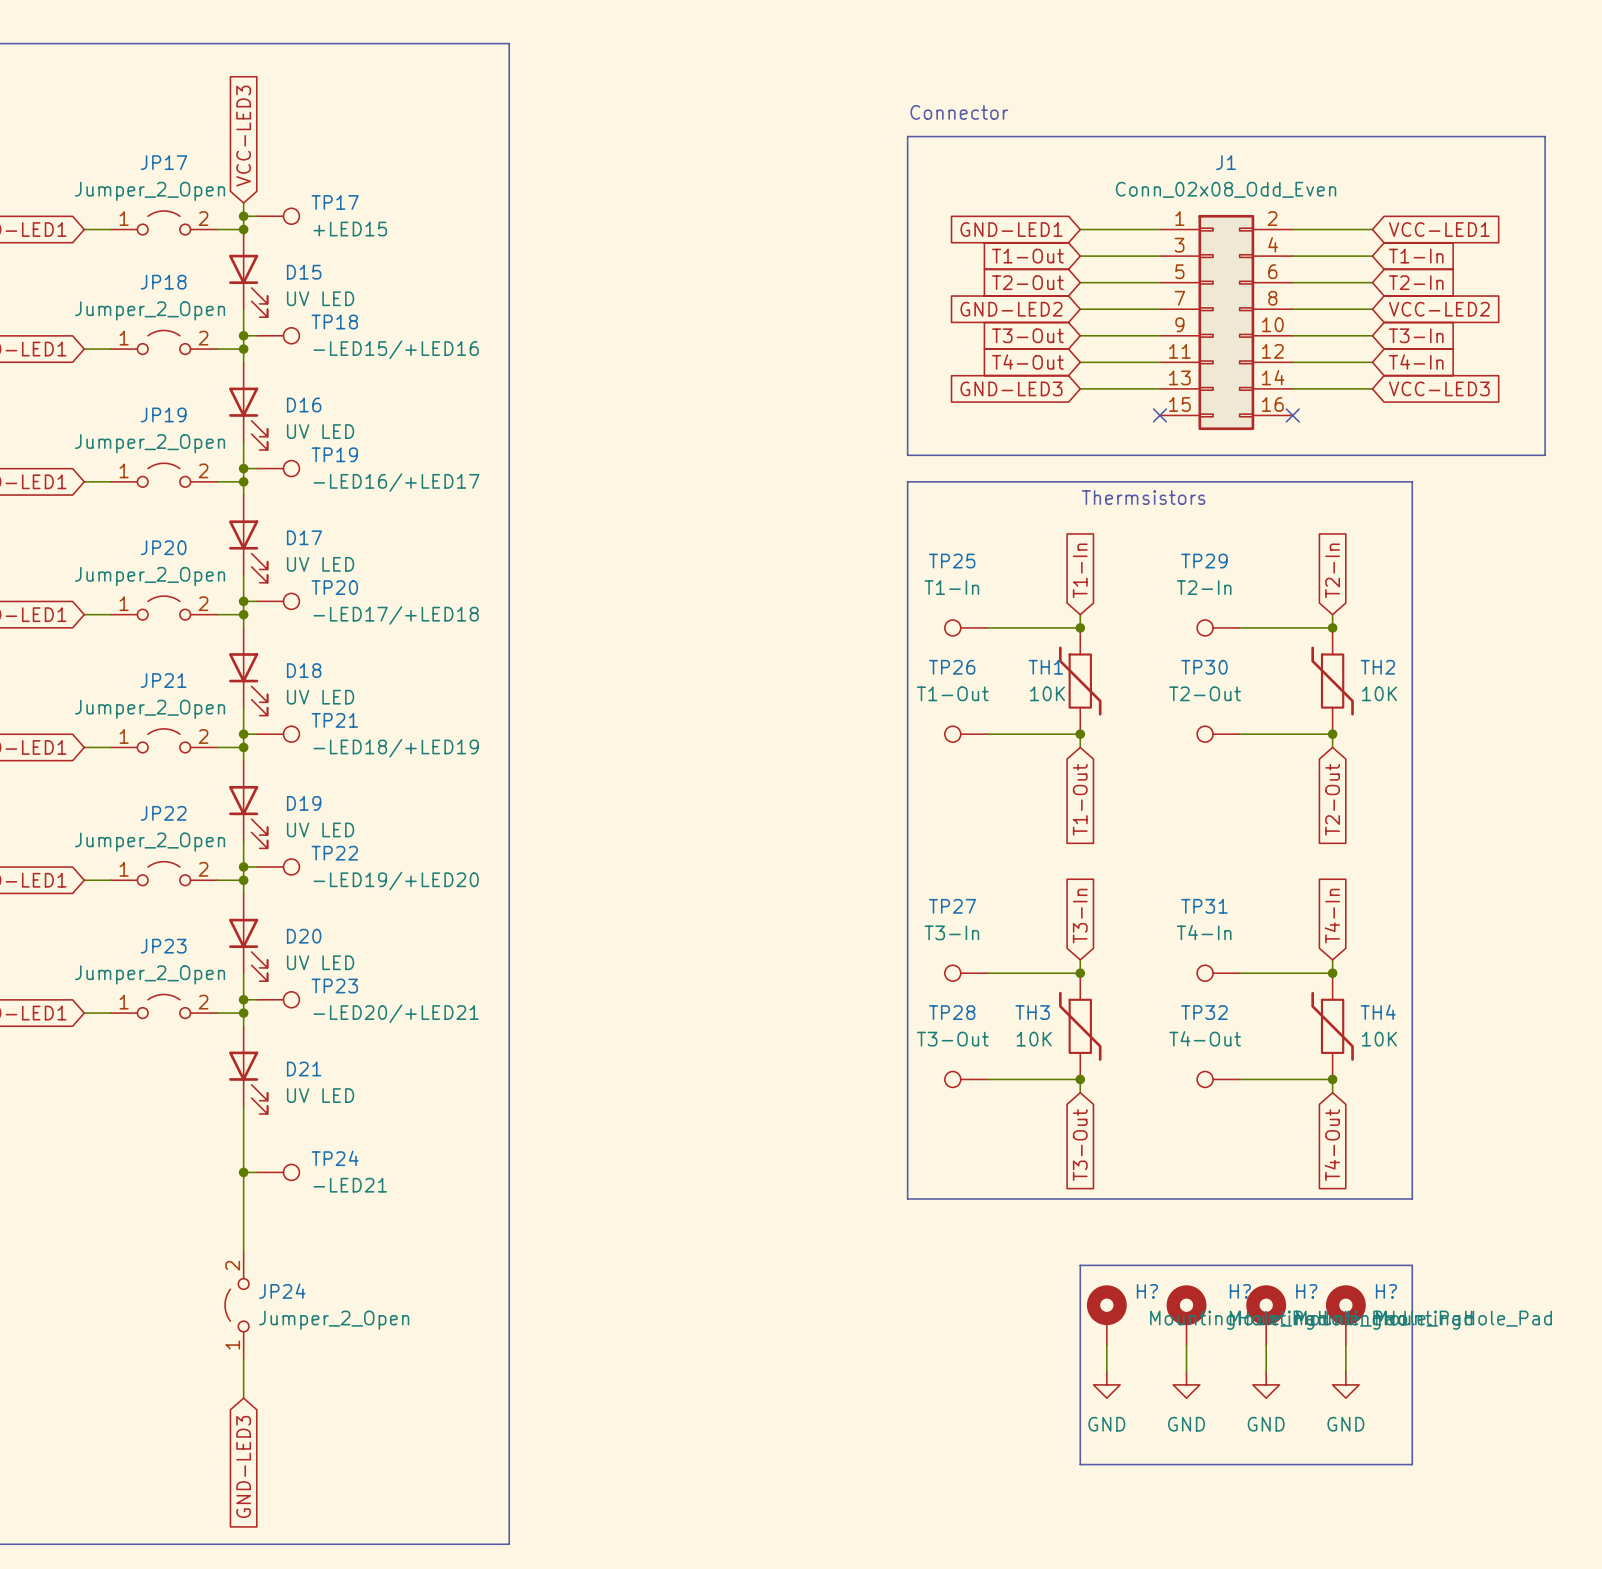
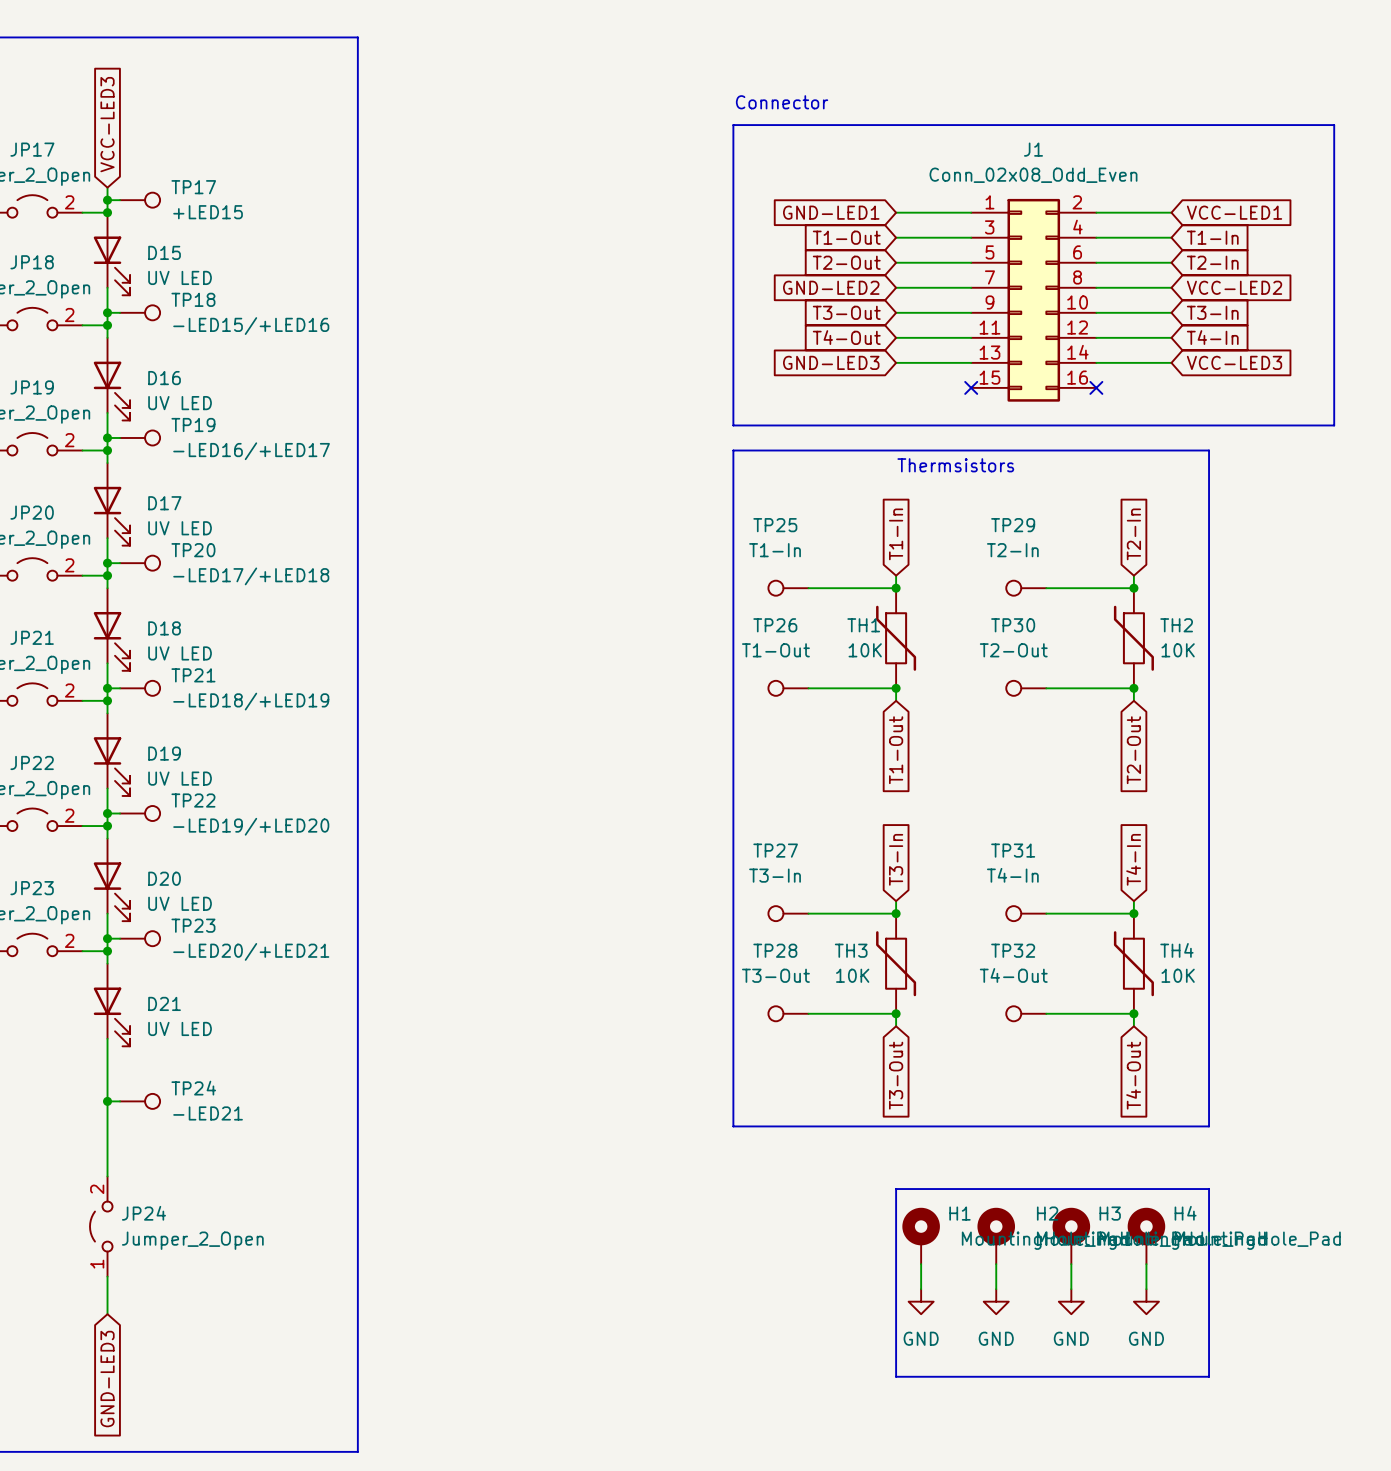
H? name: H? (1147, 1291) -> H1 (959, 1213)
H? name: H? (1240, 1291) -> H2 (1047, 1213)
H? name: H? (1306, 1291) -> H3 (1110, 1213)
H? name: H? (1386, 1291) -> H4 (1185, 1213)

